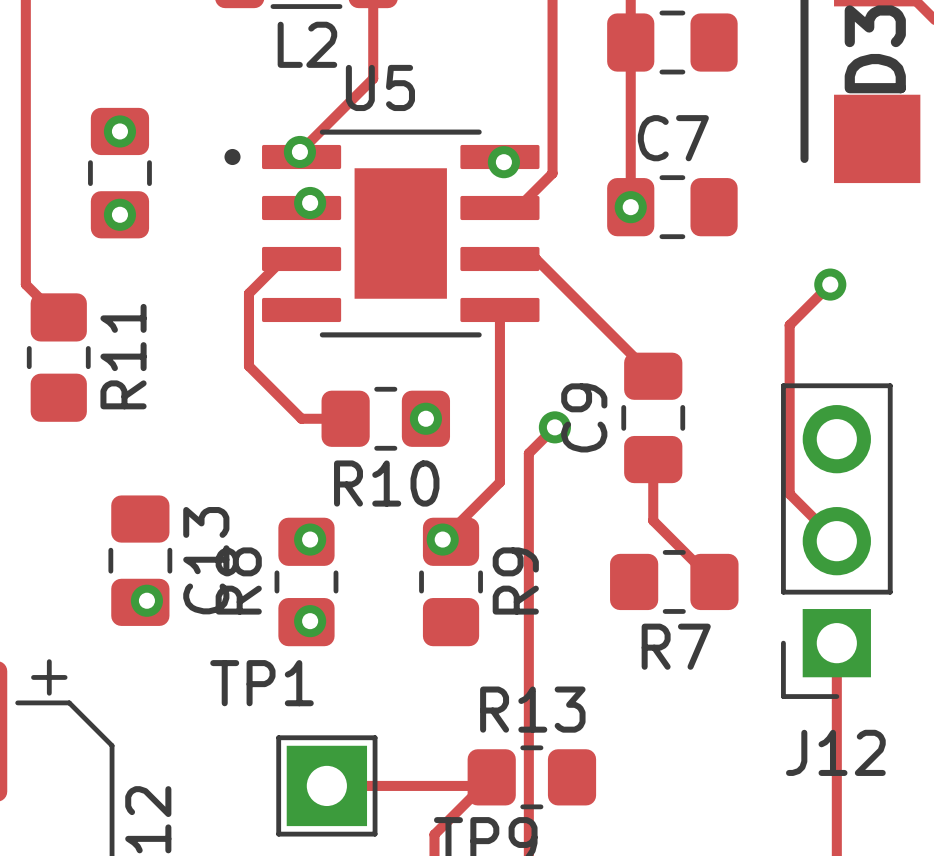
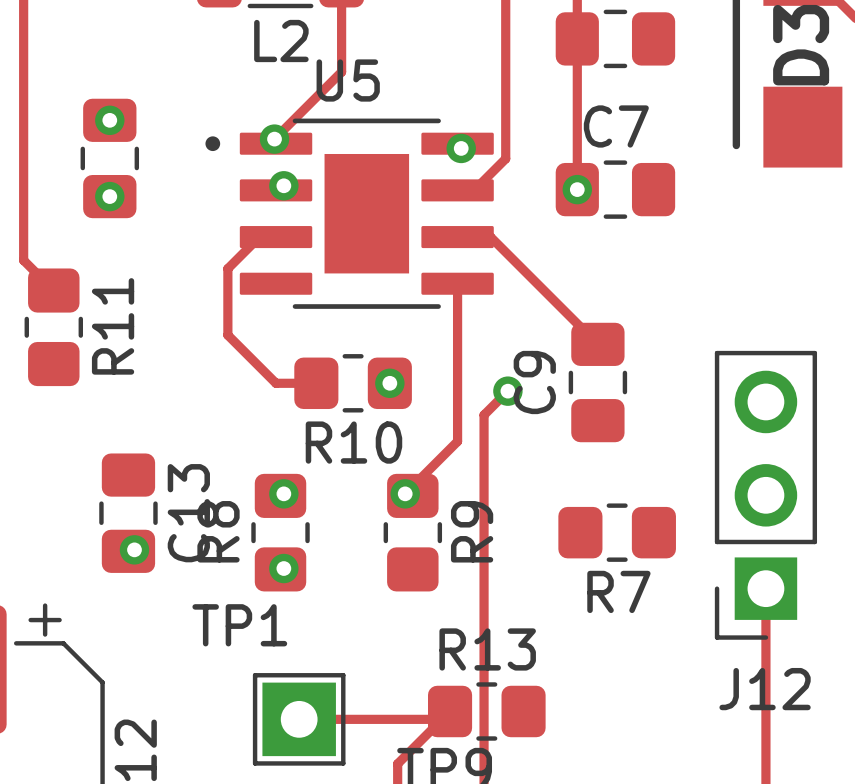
track: (830, 284) (789, 325) (789, 493) (836, 541) -> none
via: (830, 284) -> none
track: (653, 459) (653, 520) (714, 581) -> none

